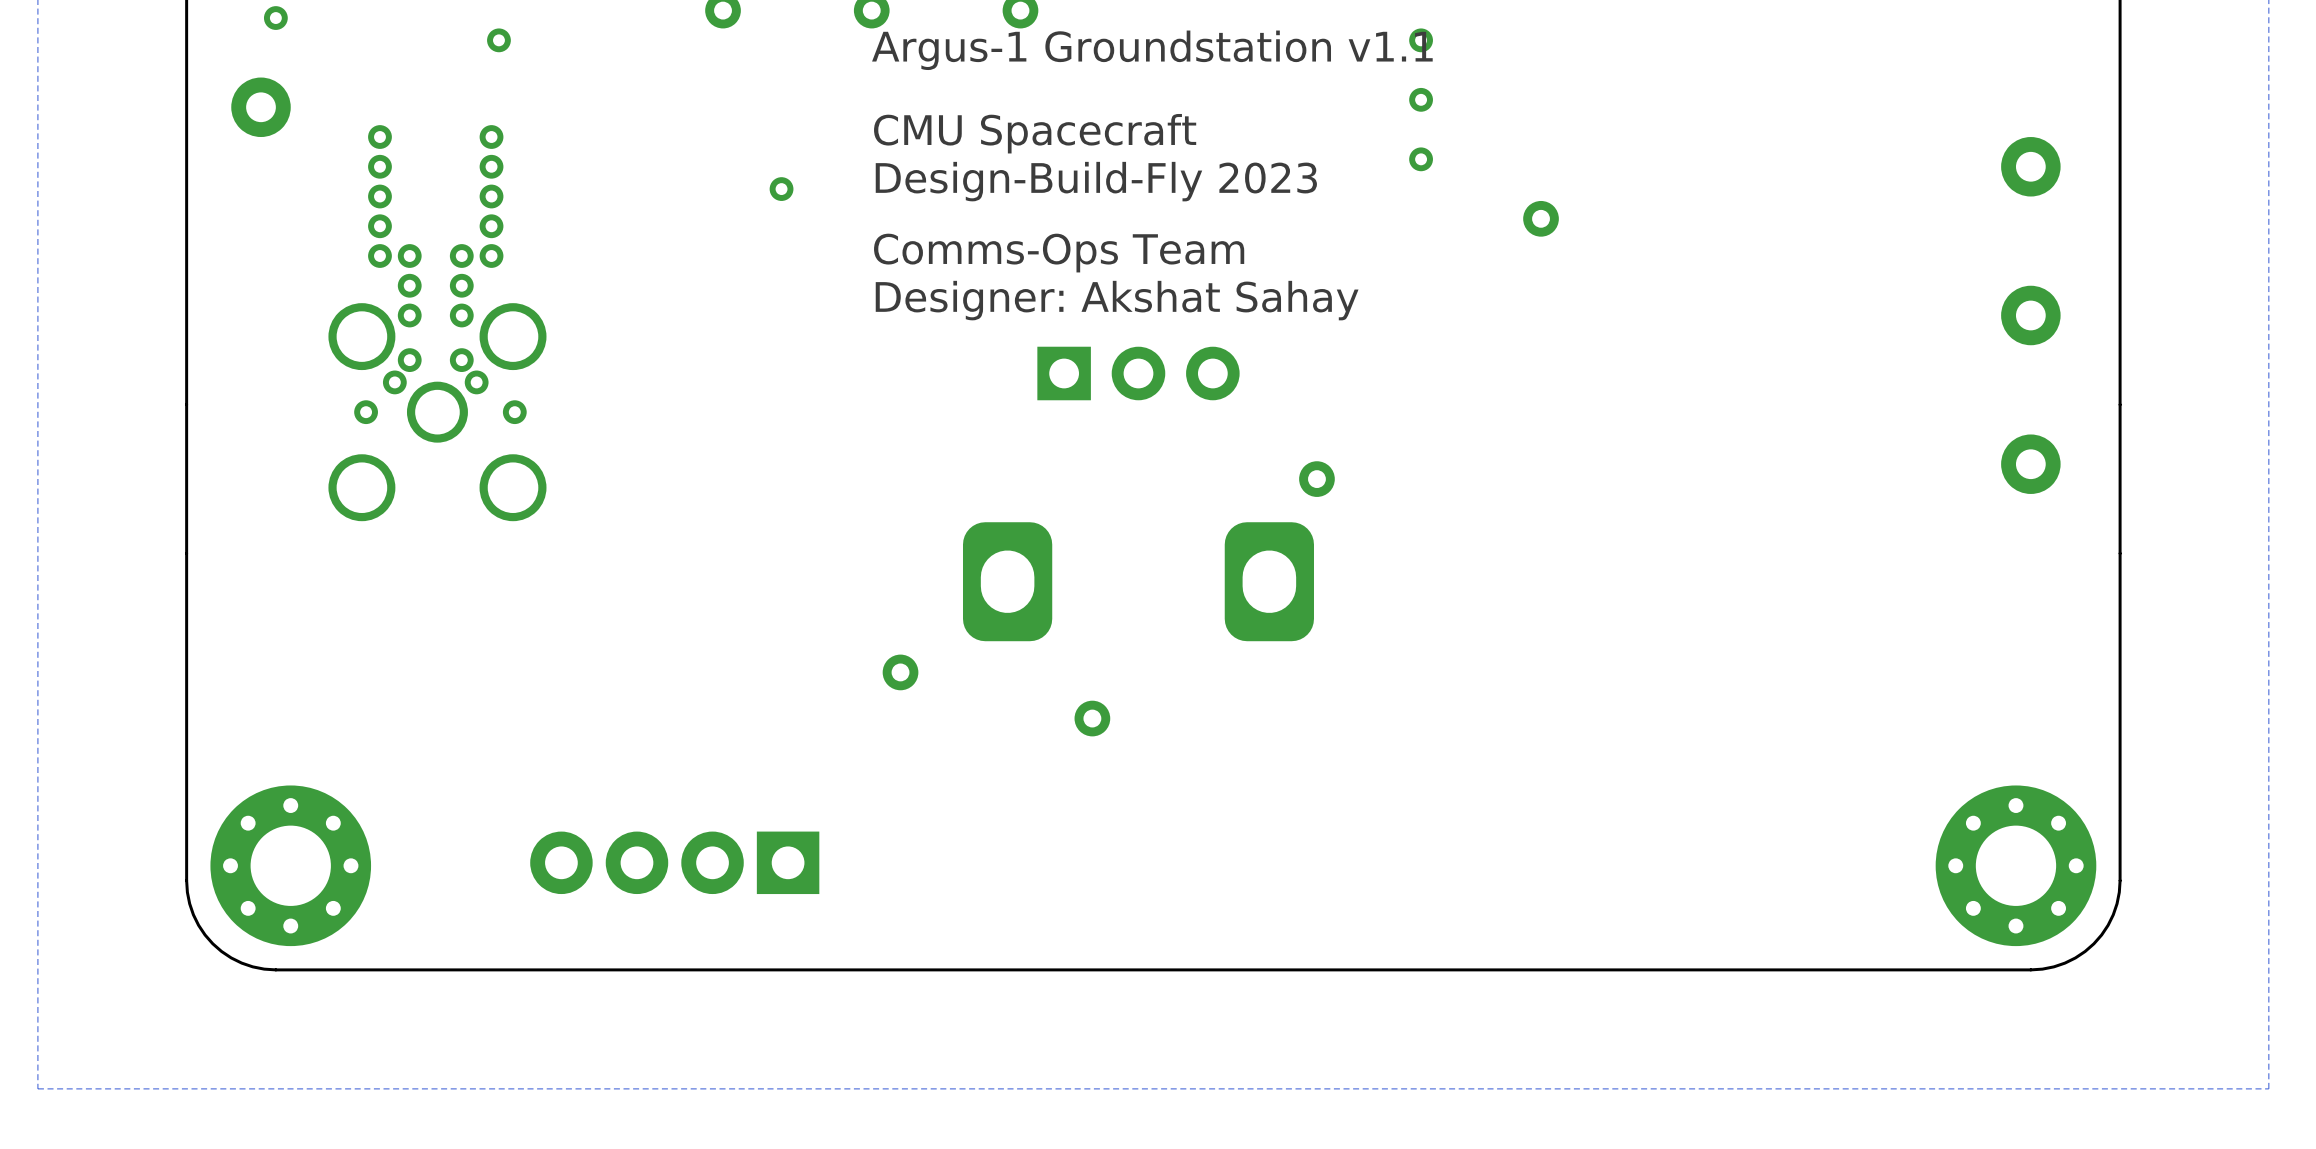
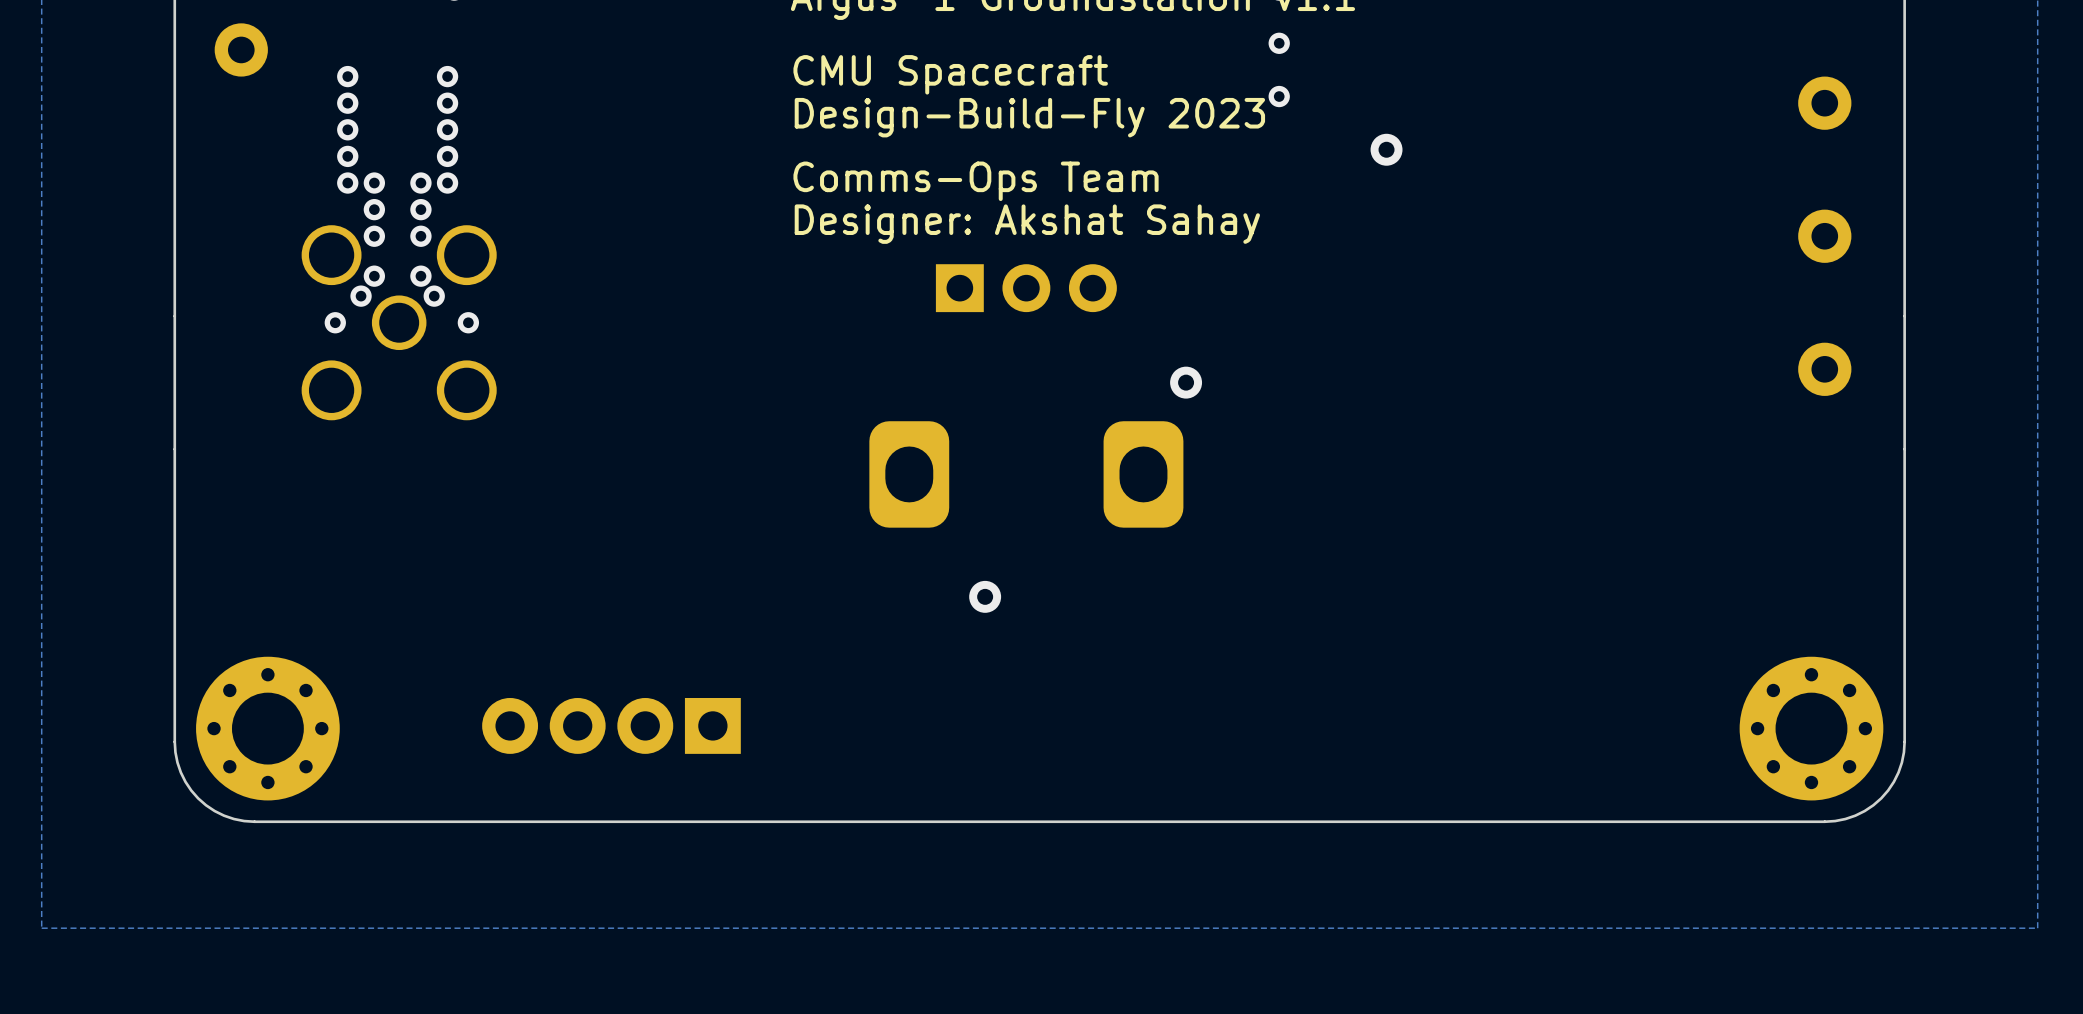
via: (781, 189) -> none
via: (900, 672) -> none

